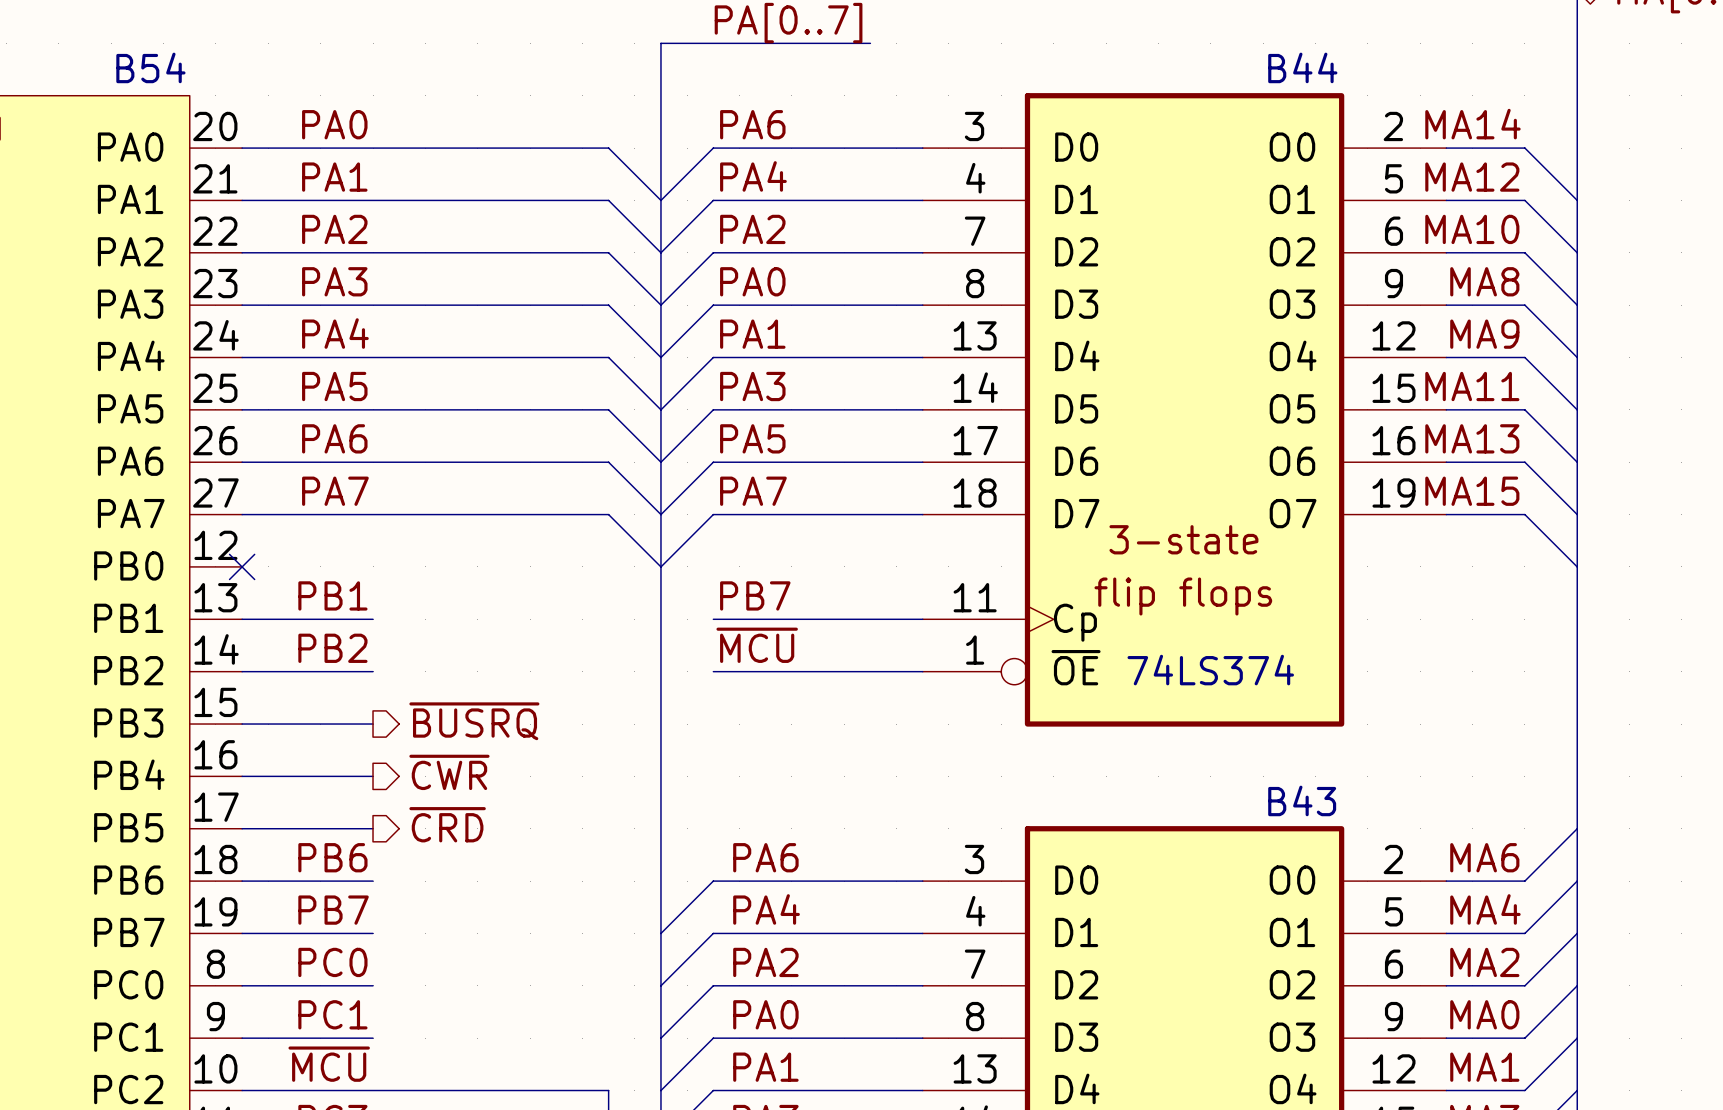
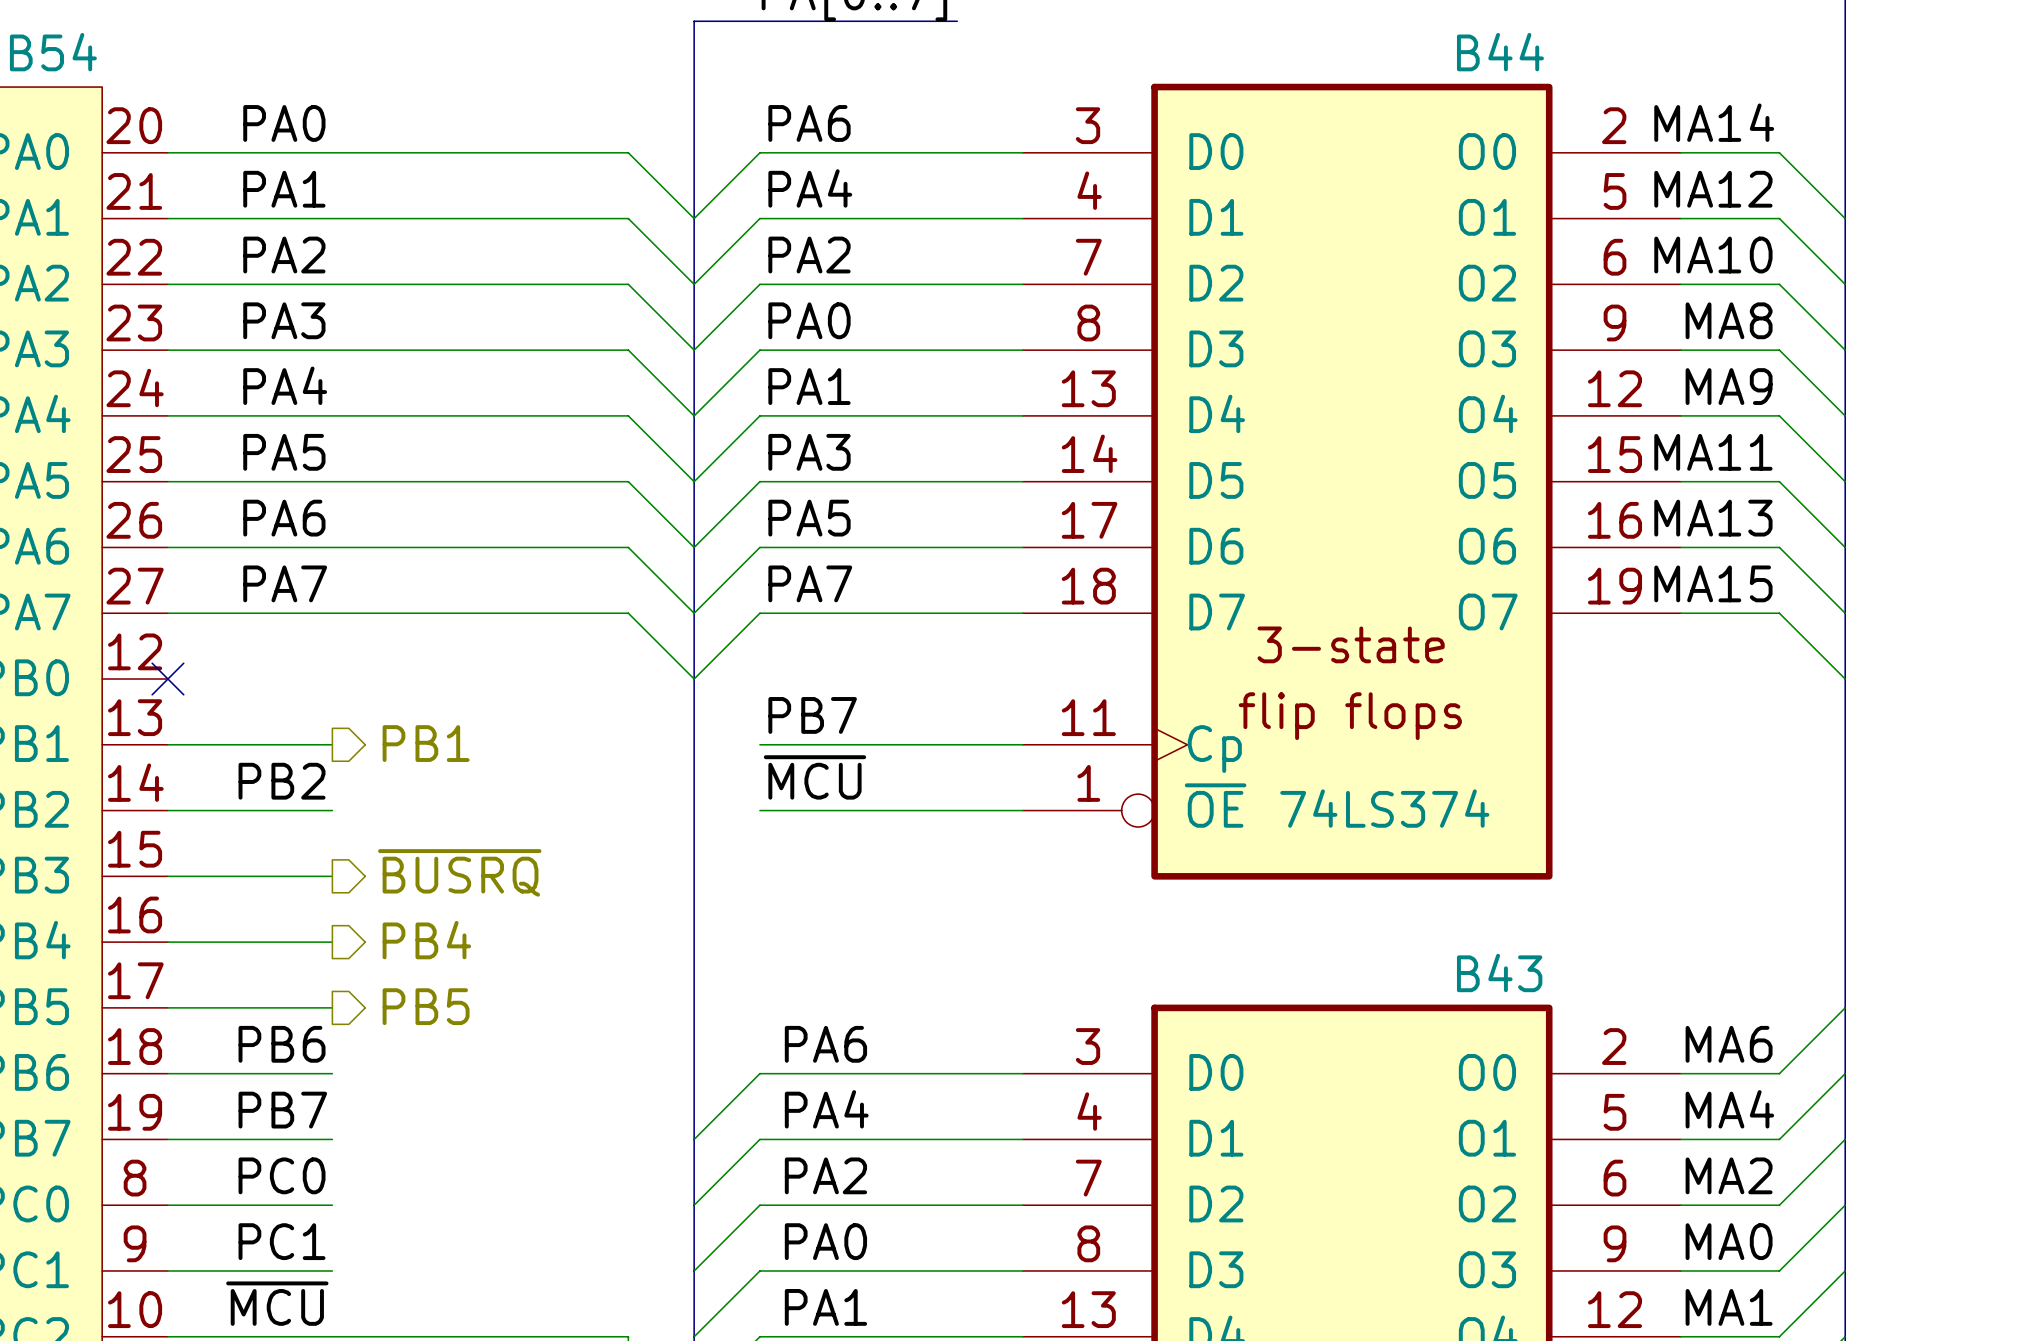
label: PB1 (332, 595) -> none
hierarchical label: none -> PB1 (426, 743)
hierarchical label: ~{CWR} (449, 772) -> PB4 (426, 940)
hierarchical label: ~{CRD} (447, 824) -> PB5 (426, 1006)

